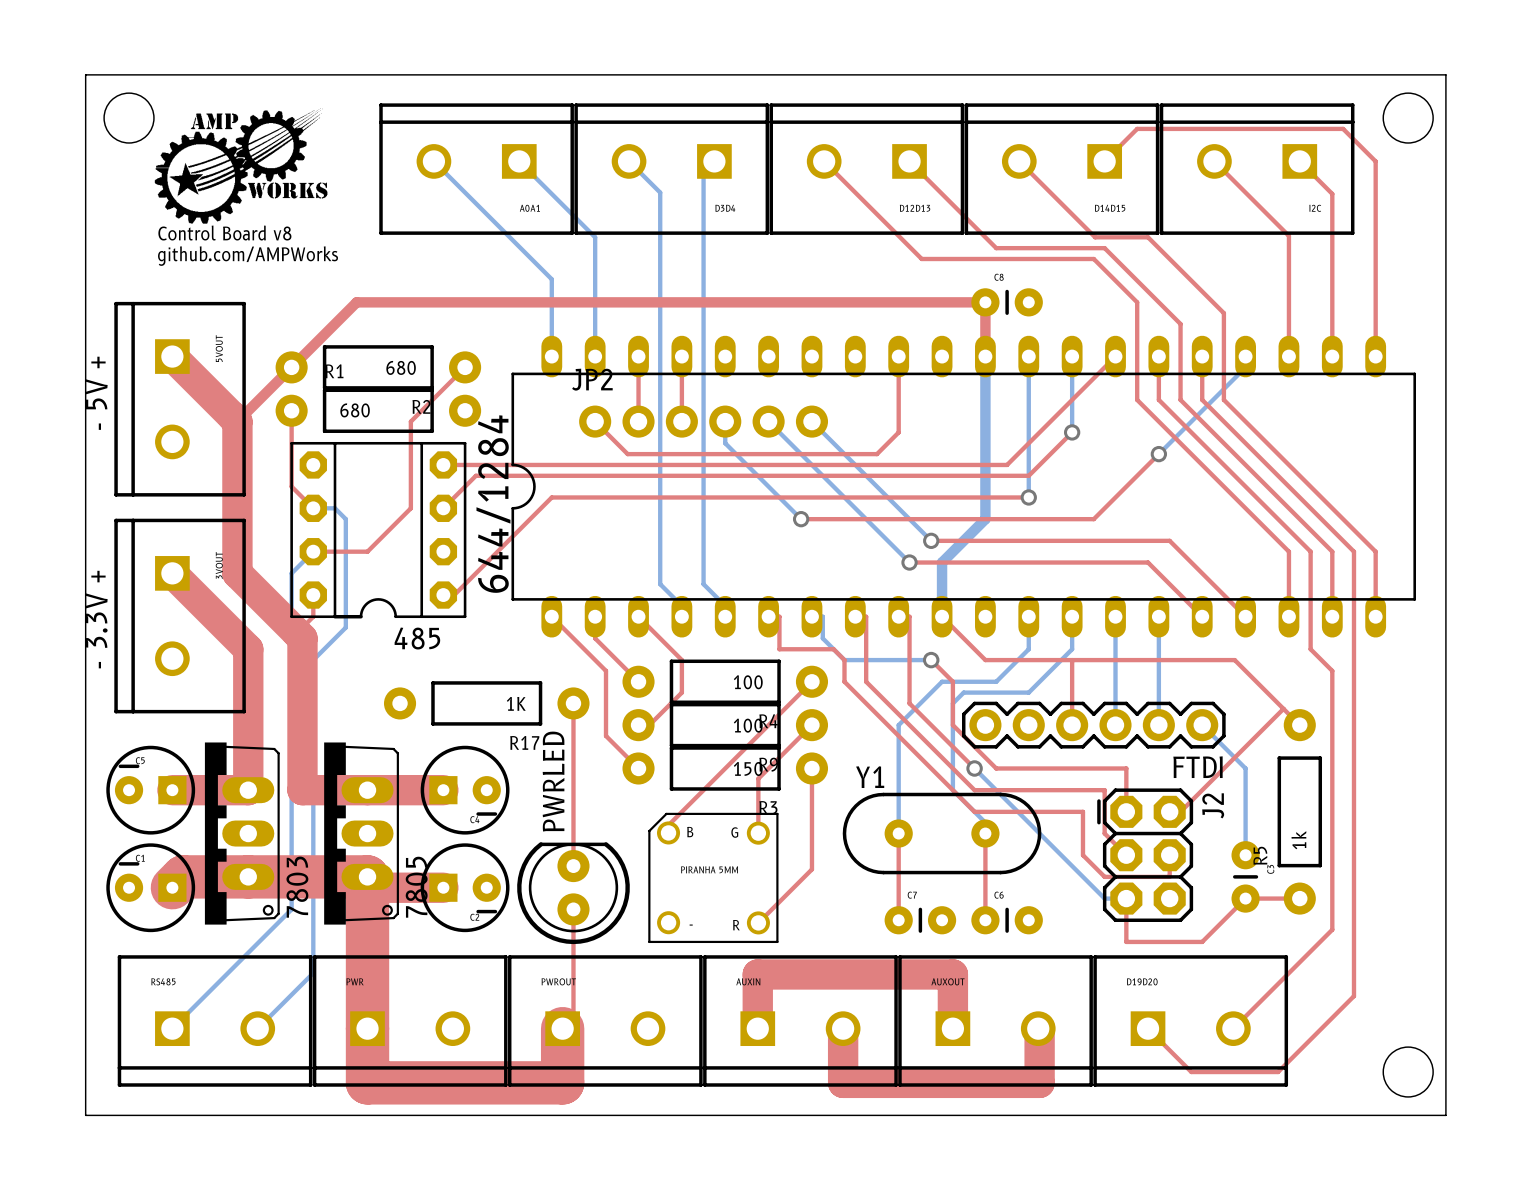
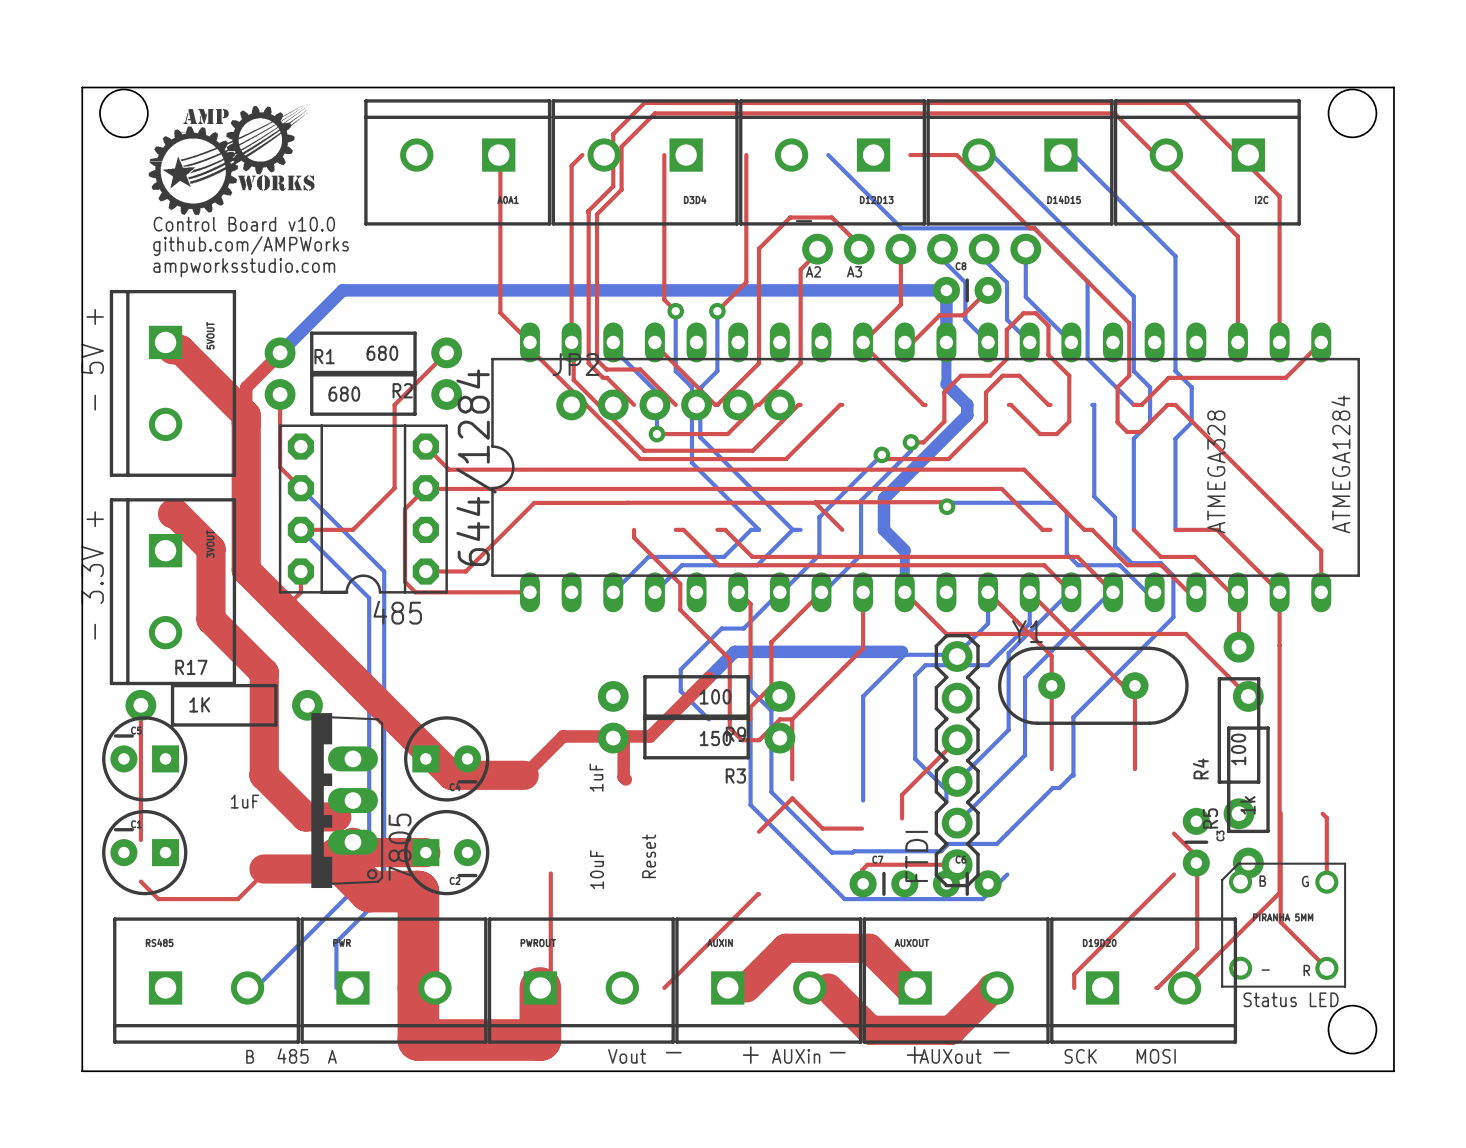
board edge: (85, 91) (85, 74) (1445, 74) (1445, 1115) -> (82, 87) (1393, 87) (1393, 1071) (1388, 1071)
bottom track: (433, 161) (551, 279) (551, 356) -> none
bottom track: (519, 161) (595, 237) (595, 356) -> none
top track: none -> (500, 155) (500, 312) (532, 342) (532, 350) (640, 459) (786, 459) (842, 404)
top track: none -> (582, 155) (571, 165) (571, 342) (573, 342) (573, 379) (644, 450) (752, 450) (800, 404)
bottom track: (629, 161) (660, 192) (660, 584) (681, 605) (681, 616) -> (792, 529) (757, 565) (681, 565) (654, 592)
top track: none -> (664, 155) (664, 299) (675, 311)
bottom track: (714, 161) (703, 172) (703, 324) -> none
top track: none -> (746, 155) (746, 282) (717, 311)
top track: (824, 161) (921, 258) (1093, 258) (1137, 302) (1137, 399) (1288, 551) (1288, 616) -> none
bottom track: none -> (828, 155) (901, 228) (1034, 228) (1087, 281) (1087, 358) (1133, 404)
top track: (909, 161) (996, 248) (1104, 248) (1180, 324) (1180, 399) (1332, 551) (1332, 616) -> none
top track: (1019, 161) (1095, 237) (1148, 237) (1223, 313) (1223, 399) (1375, 551) (1375, 573) -> none
bottom track: none -> (992, 155) (1133, 296) (1133, 371) (1150, 387) (1150, 422) (1133, 438) (1133, 529)
top track: (1104, 161) (1137, 128) (1343, 128) (1375, 161) (1375, 356) -> (1133, 404) (1141, 404) (1168, 377) (1285, 377) (1321, 342)
bottom track: none -> (1074, 155) (1175, 256) (1175, 371) (1191, 387) (1191, 422) (1175, 438) (1175, 529)
top track: (1214, 161) (1288, 235) (1288, 246) -> (675, 404) (640, 369) (606, 369) (597, 360) (597, 214) (621, 189) (621, 146) (654, 113) (1114, 113) (1237, 236)
top track: (1299, 161) (1332, 193) (1332, 204) -> (634, 404) (607, 377) (603, 377) (588, 363) (587, 211) (613, 186) (613, 134) (644, 102) (1186, 102) (1279, 196)
text: Control Board v8 (224, 233) -> Control Board v10.0 (244, 224)
top track: none -> (817, 249) (817, 252) (800, 269) (800, 363) (727, 434) (656, 434)
top track: none -> (900, 249) (900, 304) (861, 342) (925, 404)
part: none -> (921, 249)
bottom track: none -> (1025, 249) (1025, 296) (1071, 342)
text: none -> ampworksstudio.com (244, 267)
text: none -> A2 (813, 271)
text: none -> A3 (854, 271)
top track: none -> (988, 290) (963, 315) (939, 315) (912, 342) (904, 342)
via: none -> (675, 311)
bottom track: none -> (717, 311) (717, 371) (701, 387) (700, 437) (792, 529)
via: none -> (717, 311)
top track: (172, 356) (237, 421) (237, 573) (302, 638) (302, 790) (443, 790) -> none
top track: (638, 356) (638, 421) -> none
bottom track: none -> (613, 342) (615, 342) (615, 350) (656, 392) (656, 434)
top track: (681, 356) (681, 421) -> (654, 342) (652, 342) (717, 404) (759, 363) (759, 248) (790, 217) (831, 217) (859, 244) (859, 249)
top track: (898, 356) (898, 432) (877, 454) (627, 454) (595, 421) -> none
top track: (985, 356) (985, 302) (356, 302) (242, 416) (232, 416) -> none
bottom track: none -> (946, 342) (946, 290) (342, 290) (280, 352)
bottom track: (1028, 356) (1028, 497) -> (988, 342) (965, 319) (965, 282) (942, 259) (942, 249)
bottom track: (1072, 356) (1072, 432) -> (1029, 342) (1007, 319) (1007, 282) (984, 259) (984, 249)
top track: (1115, 356) (1007, 464) (443, 464) -> (1102, 540) (1092, 529) (1084, 529) (1024, 469) (448, 469) (425, 446)
top track: (1158, 356) (1158, 399) (1310, 551) (1310, 649) (1332, 670) -> (1175, 529) (1217, 529) (1279, 592) (1279, 644)
top track: (1202, 356) (1202, 399) (1223, 421) -> (910, 155) (956, 155) (1030, 228) (1034, 228) (1129, 323) (1129, 375) (1117, 387) (1117, 422) (1127, 431) (1140, 431) (1167, 404) (1175, 404)
bottom track: (1245, 356) (1245, 367) (1158, 454) -> none
top track: none -> (172, 349) (180, 349) (246, 415) (246, 570) (451, 775) (524, 775) (563, 736) (650, 736) (708, 677)
top track: none -> (280, 352) (246, 387) (246, 423)
bottom track: (703, 386) (703, 584) (725, 605) (725, 616) -> (675, 371) (691, 387) (691, 462) (759, 529) (751, 529) (724, 556) (648, 556) (613, 592)
bottom track: (985, 399) (985, 519) (942, 562) (942, 573) -> (946, 384) (967, 404) (967, 415) (883, 498) (883, 529) (904, 550)
bottom track: (725, 421) (725, 443) (801, 519) -> none
bottom track: (768, 421) (909, 562) -> none
bottom track: (811, 421) (931, 540) -> none
top track: none -> (1008, 404) (1040, 434) (1056, 434) (1069, 421) (1069, 375) (1048, 354) (1048, 325) (1035, 313) (1023, 313) (1006, 329) (1006, 359) (990, 375) (961, 375) (944, 392) (944, 421) (923, 442) (911, 442)
top track: none -> (1050, 404) (1019, 375) (1002, 375) (985, 392) (985, 421) (948, 459) (886, 459) (881, 454)
bottom track: none -> (1092, 404) (1094, 404) (1094, 496) (1115, 517) (1115, 546) (1131, 563) (1160, 563) (1173, 575) (1173, 617) (1073, 717) (1073, 775) (1059, 788) (1052, 788) (996, 843) (948, 843) (941, 851) (831, 852) (771, 792) (771, 710) (750, 689) (750, 677)
top track: (1072, 432) (1028, 475) (475, 475) (443, 508) -> none
via: (1072, 432) -> none
via: none -> (656, 434)
top track: (1158, 454) (1093, 519) (801, 519) -> none
via: (1158, 454) -> none
bottom track: none -> (911, 442) (911, 450) (861, 500) (861, 554) (821, 592)
via: none -> (911, 442)
via: none -> (881, 454)
text: none -> ATMEGA1284 (1340, 464)
text: none -> ATMEGA328 (1216, 471)
top track: (1028, 497) (551, 497) (454, 595) -> (627, 502) (534, 502) (465, 571) (436, 571)
via: (1028, 497) -> none
bottom track: (313, 508) (334, 508) (345, 519) (345, 627) (313, 660) (313, 973) (257, 1028) -> (300, 488) (384, 571) (384, 894) (336, 942) (336, 987)
via: (801, 519) -> none
top track: none -> (627, 502) (815, 502)
top track: none -> (815, 502) (942, 502) (947, 506)
bottom track: none -> (947, 506) (950, 502) (1057, 502) (1066, 512) (1066, 553) (1078, 565) (1119, 565) (1146, 592) (1154, 592)
via: none -> (947, 506)
top track: none -> (172, 513) (175, 513) (210, 549) (210, 619) (264, 672) (263, 775) (305, 816) (336, 816)
top track: (931, 540) (1169, 540) (1180, 551) -> none
via: (931, 540) -> none
bottom track: (313, 551) (291, 573) (291, 909) (172, 1028) -> (300, 529) (369, 598) (369, 874) (254, 987)
top track: none -> (634, 529) (634, 537) (680, 583) (680, 609) (729, 659) (729, 728) (741, 740) (759, 740) (780, 719) (792, 719)
top track: none -> (675, 529) (683, 529) (718, 565) (1044, 565) (1071, 592)
top track: none -> (717, 529) (725, 529) (752, 556) (1077, 556) (1113, 592)
bottom track: none -> (792, 529) (800, 529)
top track: (1353, 551) (1353, 996) (1278, 1072) (1191, 1072) (1148, 1028) -> (1300, 529) (1321, 550)
top track: (909, 562) (1148, 562) -> none
via: (909, 562) -> none
top track: (172, 573) (248, 649) (248, 790) (172, 790) -> none
top track: (1208, 579) (1245, 616) -> (1127, 565) (1161, 565) (1188, 592) (1196, 592)
top track: none -> (1160, 556) (1194, 556) (1230, 592) (1239, 593) (1239, 647)
top track: (1174, 588) (1202, 616) -> (815, 502) (842, 529)
top track: (551, 616) (606, 670) (606, 735) (638, 768) -> (529, 592) (415, 592) (405, 581) (405, 509) (425, 488) (1001, 488) (1042, 529) (1050, 529)
top track: (595, 616) (595, 638) (638, 681) -> none
top track: (638, 616) (681, 660) (681, 692) (649, 725) (638, 725) -> none
top track: (769, 616) (779, 616) (779, 649) (833, 649) (844, 660) (844, 681) (974, 811) (1082, 811) (1082, 855) (1104, 876) (1169, 876) (1169, 855) -> (738, 592) (750, 603) (750, 677)
bottom track: none -> (779, 592) (743, 628) (721, 628) (680, 669) (680, 691) (708, 719)
bottom track: (814, 616) (822, 616) (822, 638) (844, 660) (931, 660) -> (781, 592) (819, 554) (819, 517) (881, 454)
top track: (855, 616) (866, 616) (866, 681) (974, 790) (1104, 790) (1104, 833) (1126, 855) -> (821, 592) (771, 642) (771, 686) (750, 707) (750, 719)
top track: (898, 616) (909, 616) (909, 703) (974, 768) -> (863, 592) (863, 648) (792, 719)
top track: none -> (988, 592) (1051, 655) (1051, 769)
top track: none -> (1029, 592) (1123, 685) (1134, 685) (1134, 769)
bottom track: (1115, 616) (1115, 725) -> (1071, 592) (1008, 653) (1008, 729) (957, 781)
bottom track: (1158, 616) (1158, 725) -> (1113, 592) (1110, 592) (1025, 677) (1025, 755) (957, 823)
top track: (931, 660) (952, 681) (952, 725) (996, 768) (1126, 768) (1126, 811) -> none
via: (931, 660) -> none
top track: (1072, 660) (1072, 725) -> none
bottom track: none -> (902, 651) (734, 651) (708, 677)
R4 rotation: 0° (725, 681) -> 90° clockwise (1239, 730)
R4 position: (725, 681) -> (1239, 730)
top track: (811, 681) (668, 825) (668, 832) -> none
R17 position: (486, 703) -> (224, 705)
R17 value position: 1K (516, 703) -> 1K (199, 704)
top track: (573, 703) (573, 866) -> none
top track: (1283, 708) (1180, 811) (1169, 811) -> none
top track: (811, 725) (758, 778) (758, 833) -> none
FTDI rotation: 0° (1093, 725) -> 90° clockwise (957, 760)
bottom track: (1202, 725) (1245, 768) (1245, 855) -> none
top track: none -> (140, 705) (140, 839)
R17 name position: R17 (524, 742) -> R17 (191, 667)
bottom track: none -> (750, 719) (750, 804) (844, 899) (982, 899) (1007, 874)
top track: none -> (792, 719) (792, 779)
top track: none -> (623, 736) (623, 777) (625, 779)
top track: (811, 768) (811, 869) (758, 922) -> none
bottom track: (974, 768) (1104, 898) (1126, 898) -> none
via: (974, 768) -> none
top track: none -> (957, 739) (902, 794) (902, 818)
text: none -> 1uF (596, 777)
7803: (242, 833) -> none
top track: (898, 833) (898, 920) -> none
Y1 position: (942, 833) -> (1093, 685)
top track: (985, 833) (985, 920) -> none
text: none -> 1uF (244, 801)
top track: none -> (1280, 813) (1280, 922) (1326, 968)
top track: none -> (1322, 813) (1326, 817) (1326, 882)
J2: (1145, 855) -> none
top track: none -> (861, 828) (822, 828) (792, 798) (759, 831)
top track: none -> (1173, 833) (1197, 856) (1197, 948) (1156, 987)
part: (713, 877) -> none
top track: (172, 887) (183, 876) (367, 876) (367, 1082) (435, 1082) -> (140, 881) (158, 899) (238, 899) (263, 873) (263, 869) (326, 869) (336, 858) (369, 891) (418, 891) (418, 1040)
PWRLED: (573, 893) -> none
text: none -> Reset (649, 856)
top track: (1126, 898) (1126, 941) (1202, 941) (1245, 898) (1299, 898) -> none
top track: none -> (957, 864) (867, 864) (861, 870)
text: none -> 10uF (597, 869)
top track: none -> (1173, 874) (1074, 974) (1074, 987)
top track: none -> (759, 894) (664, 987)
part: none -> (1283, 925)
top track: (757, 1028) (757, 974) (952, 974) (952, 1028) -> none
top track: none -> (746, 987) (785, 948) (869, 948) (910, 987)
top track: (843, 1028) (843, 1082) (1039, 1082) (1038, 1028) -> none
top track: none -> (828, 987) (870, 1030) (951, 1030) (992, 987)
text: none -> Status LED (1291, 999)
text: none -> - (673, 1052)
text: none -> - (837, 1052)
text: none -> - (1001, 1052)
text: none -> + (750, 1055)
text: none -> + (914, 1055)
text: none -> 485 (293, 1056)
text: none -> AUXin (796, 1056)
text: none -> AUXout (950, 1056)
text: none -> SCK (1080, 1056)
text: none -> MOSI (1156, 1056)
text: none -> B (250, 1056)
text: none -> A (332, 1056)
text: none -> Vout (627, 1056)

